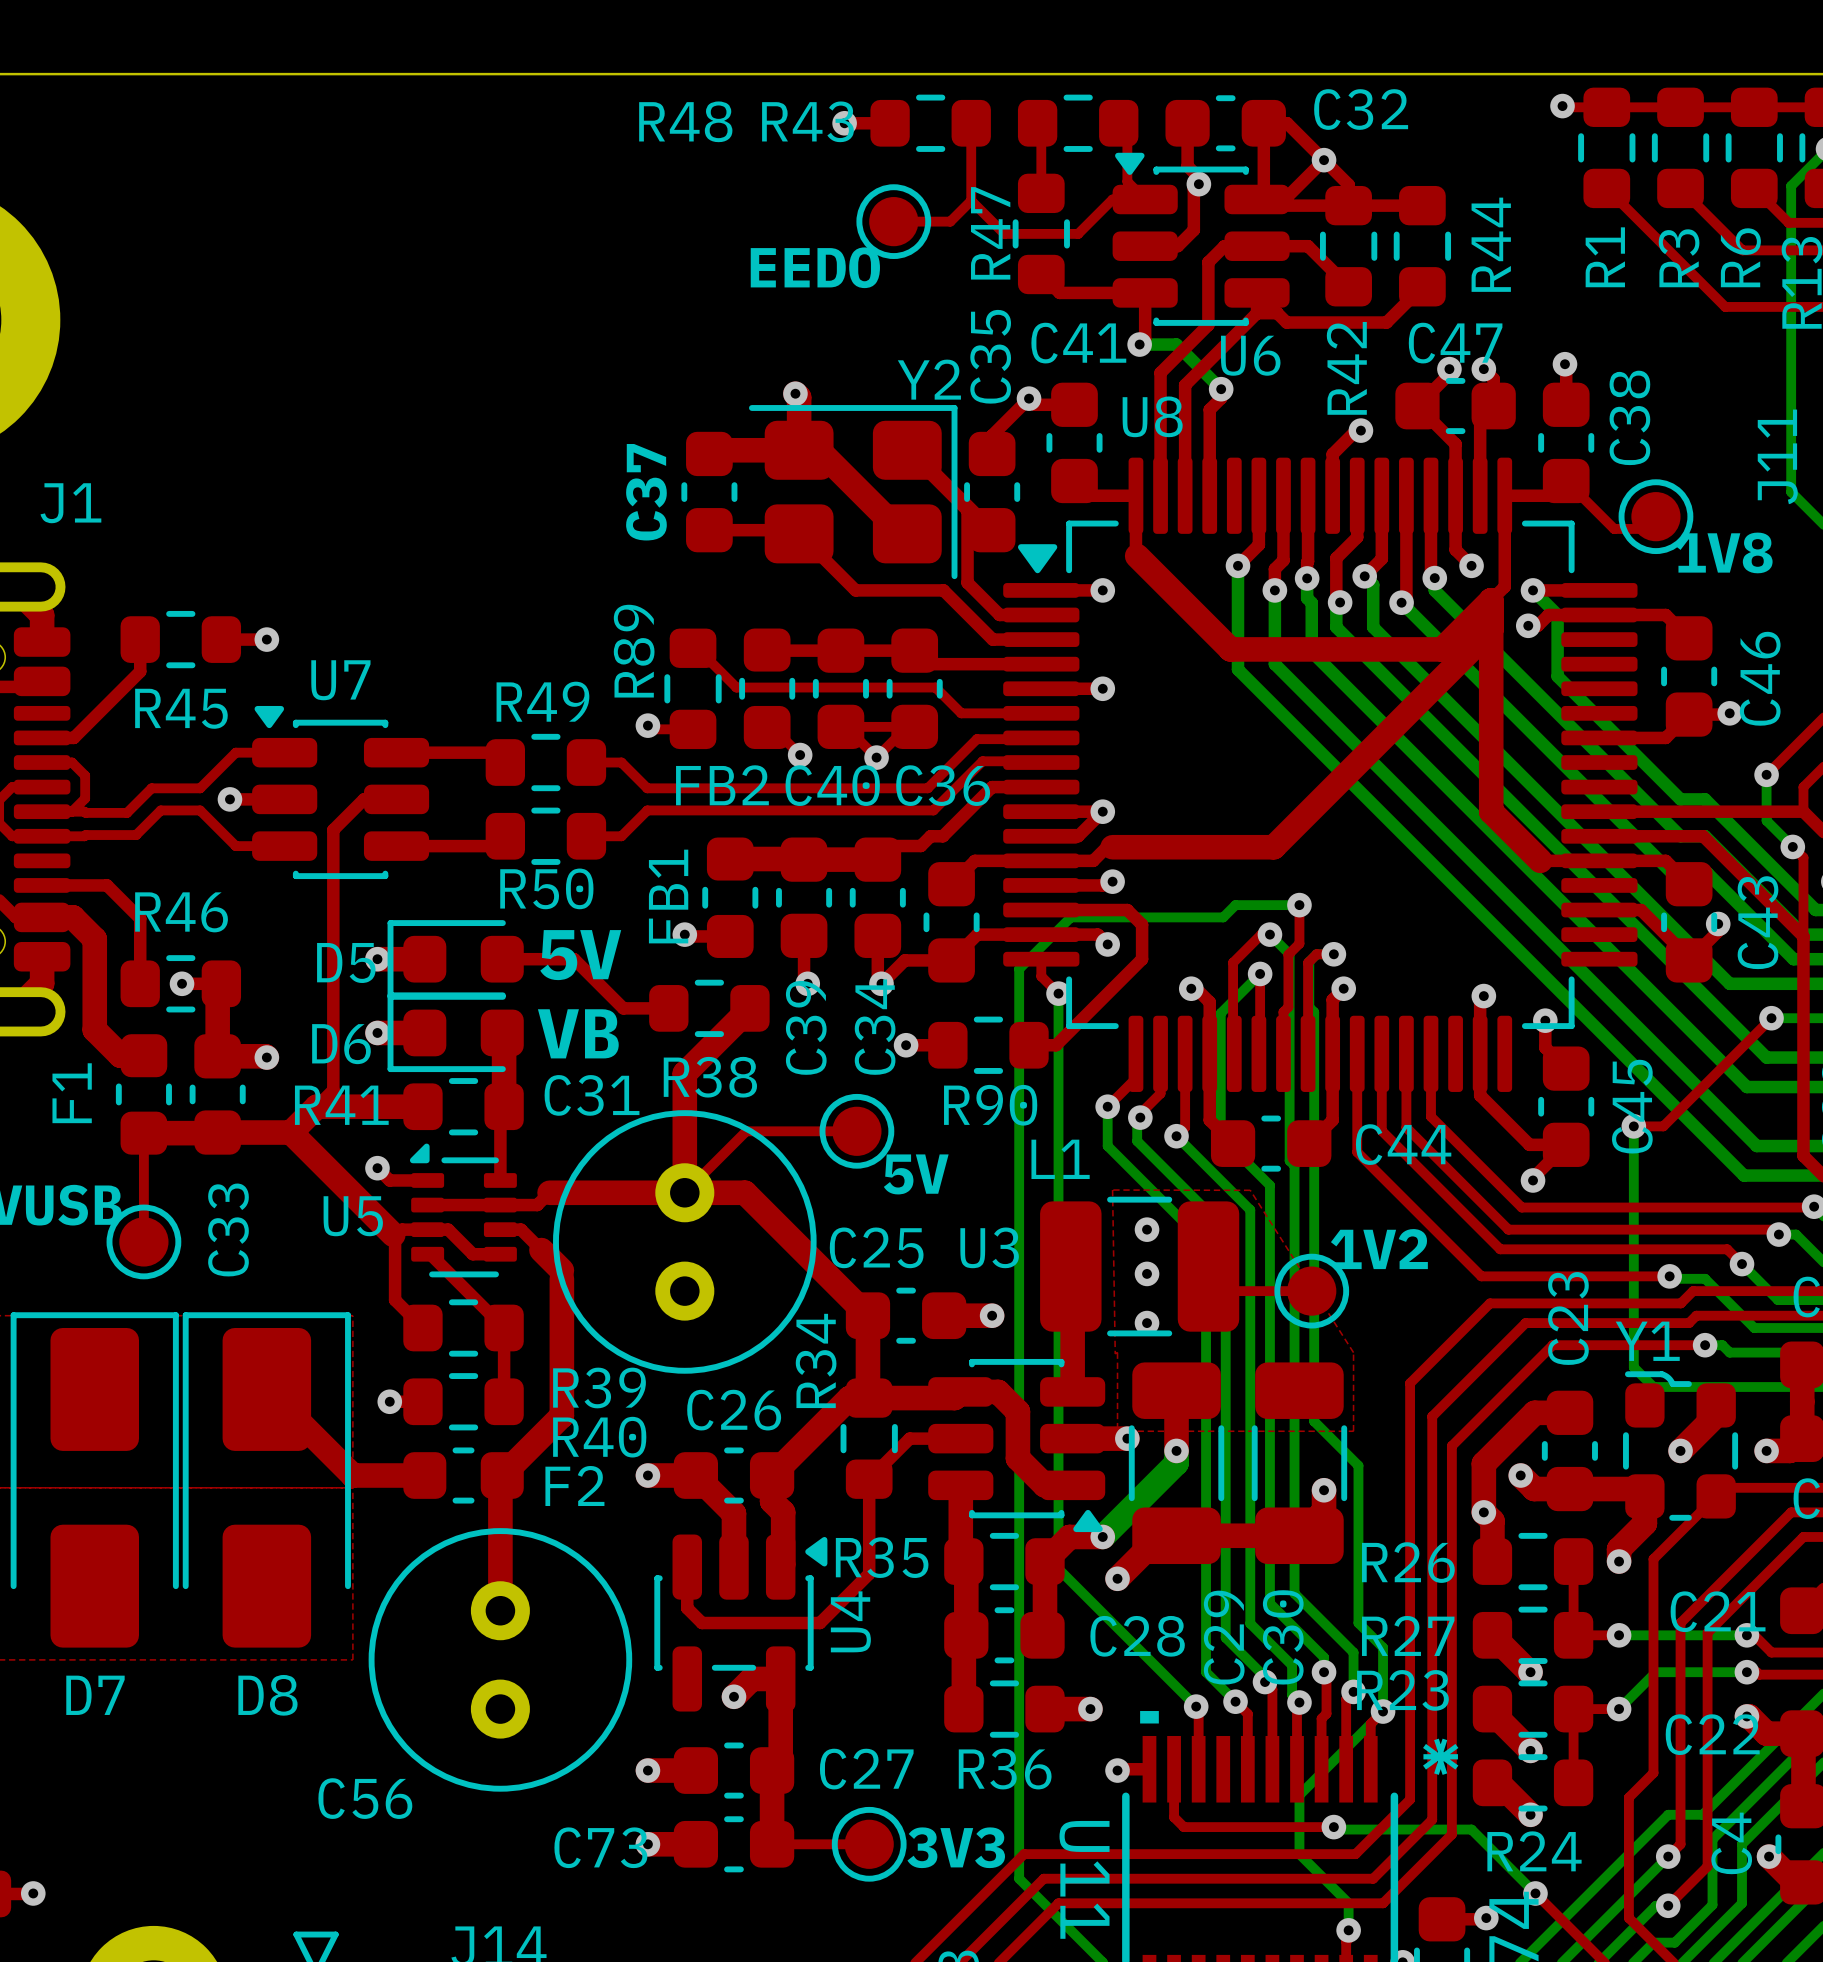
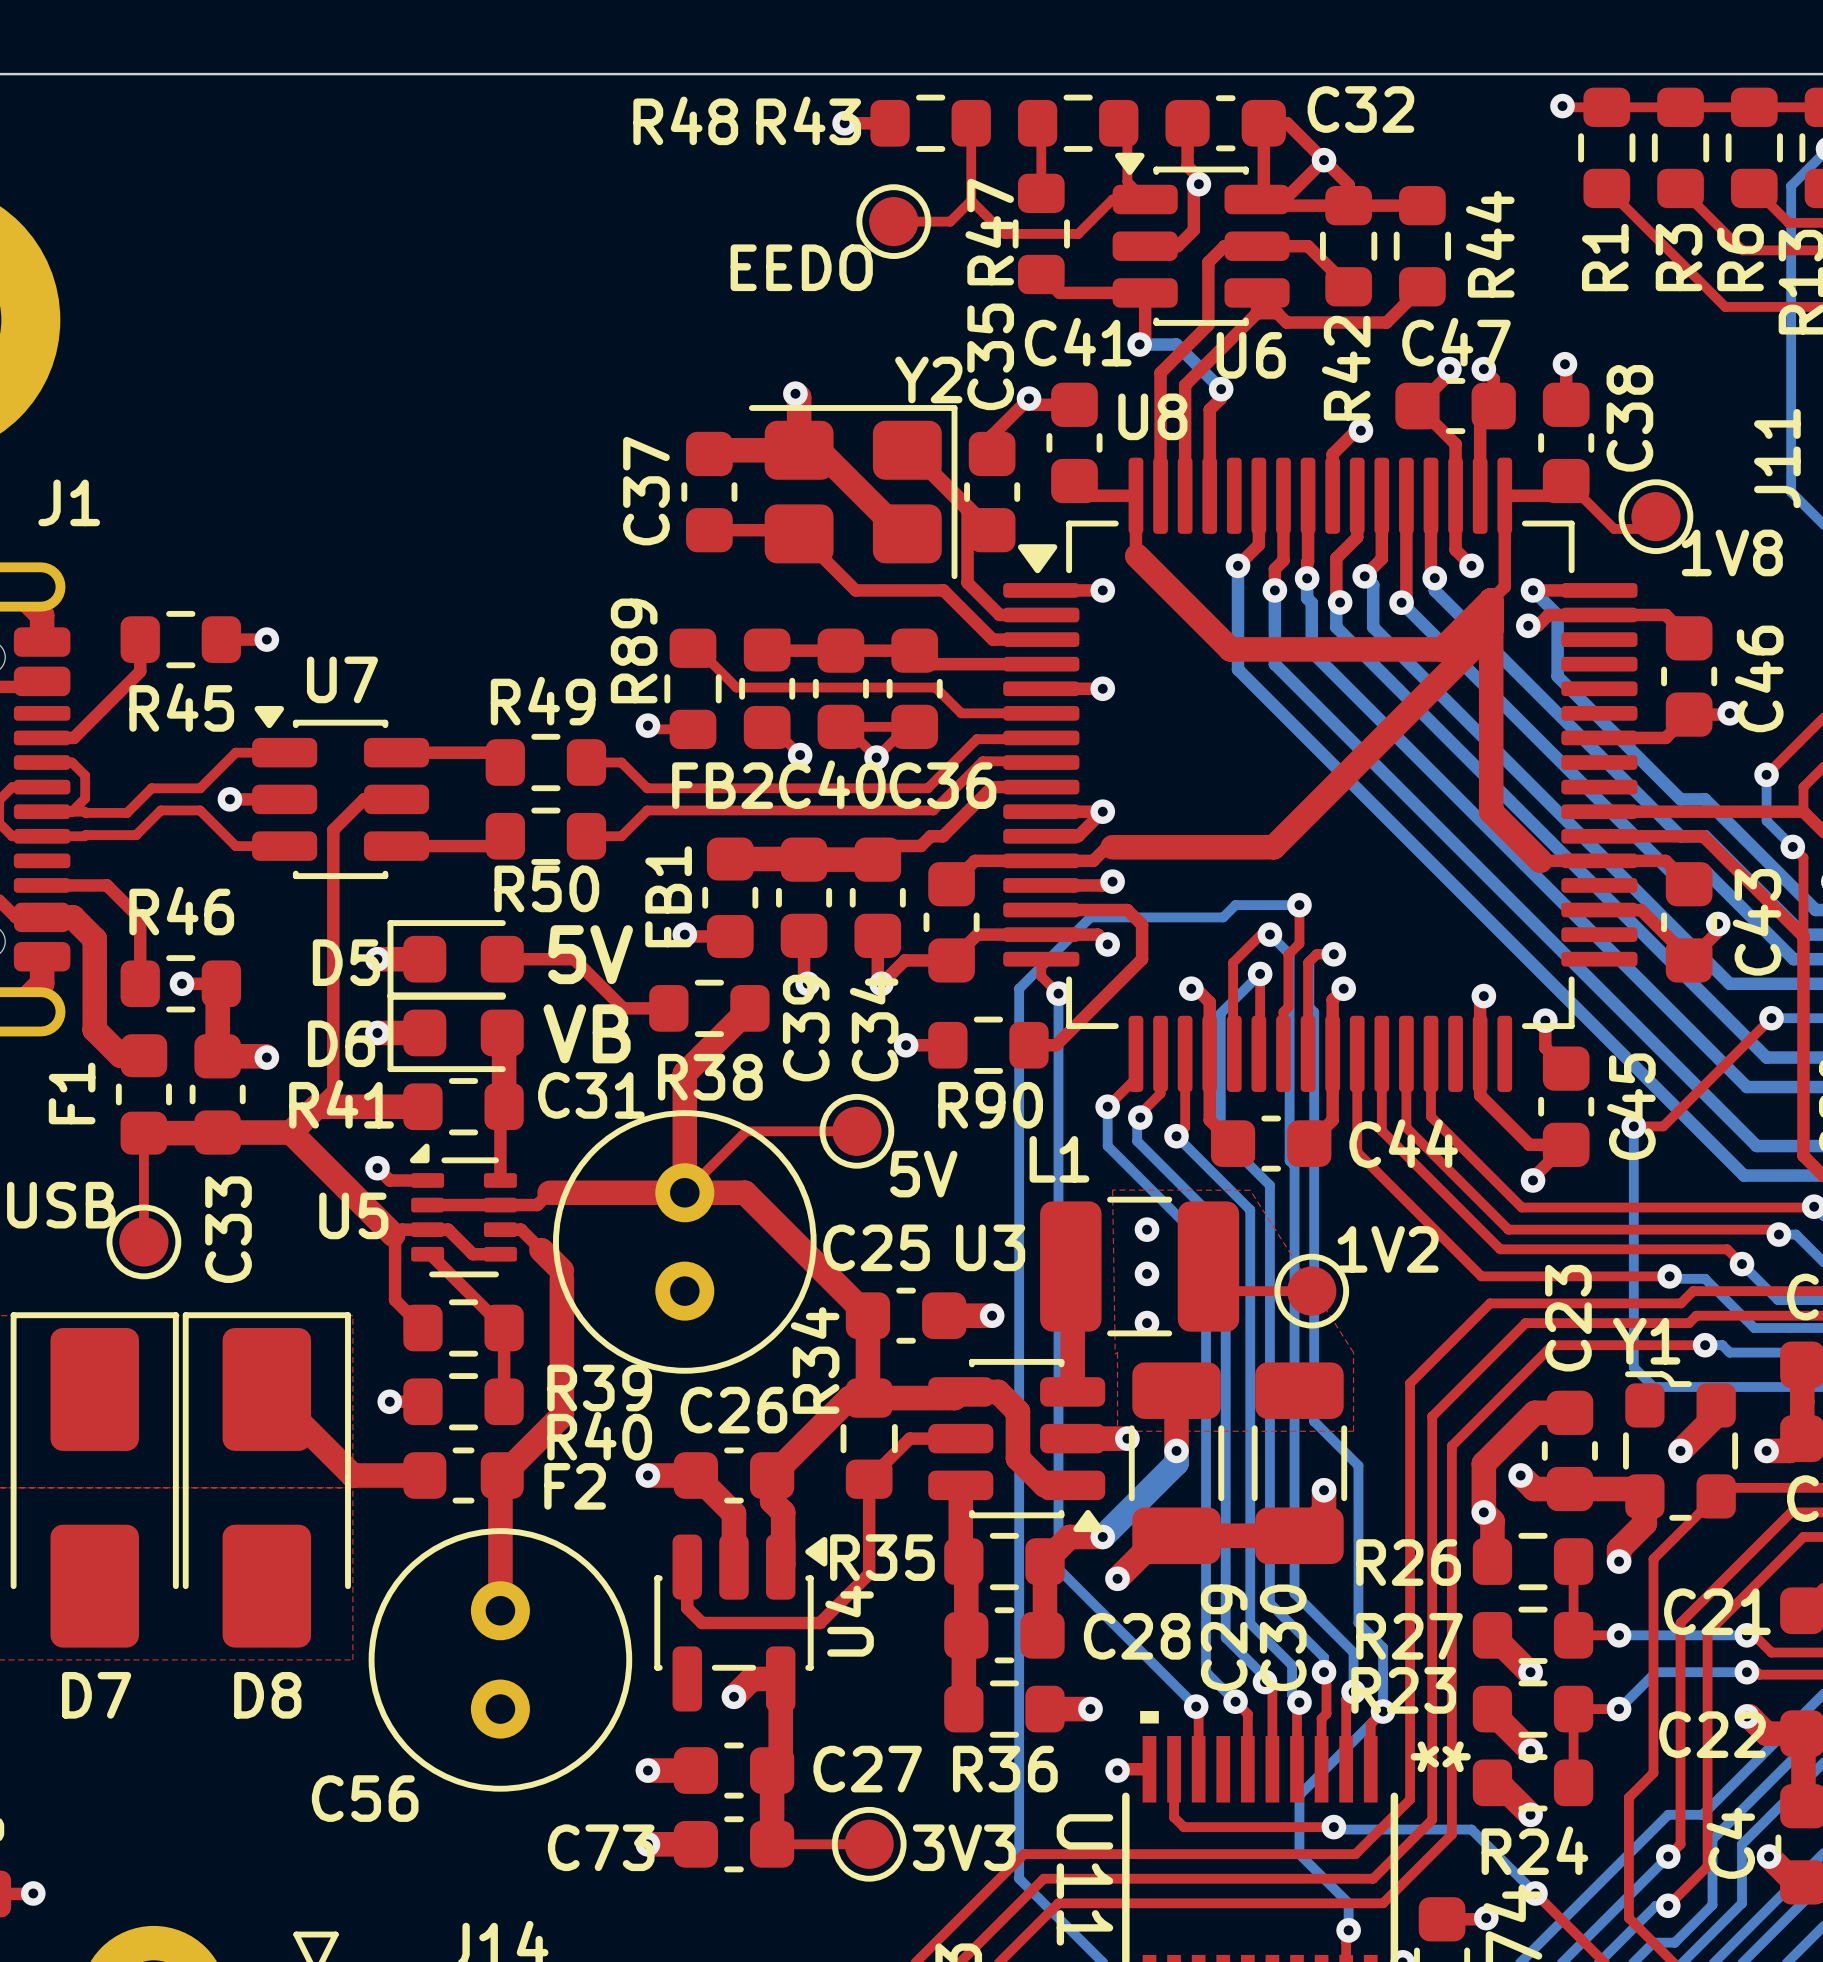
bottom track: (1090, 917) (1070, 917) (1019, 969) (1019, 988) -> (1090, 917) (1019, 988)

